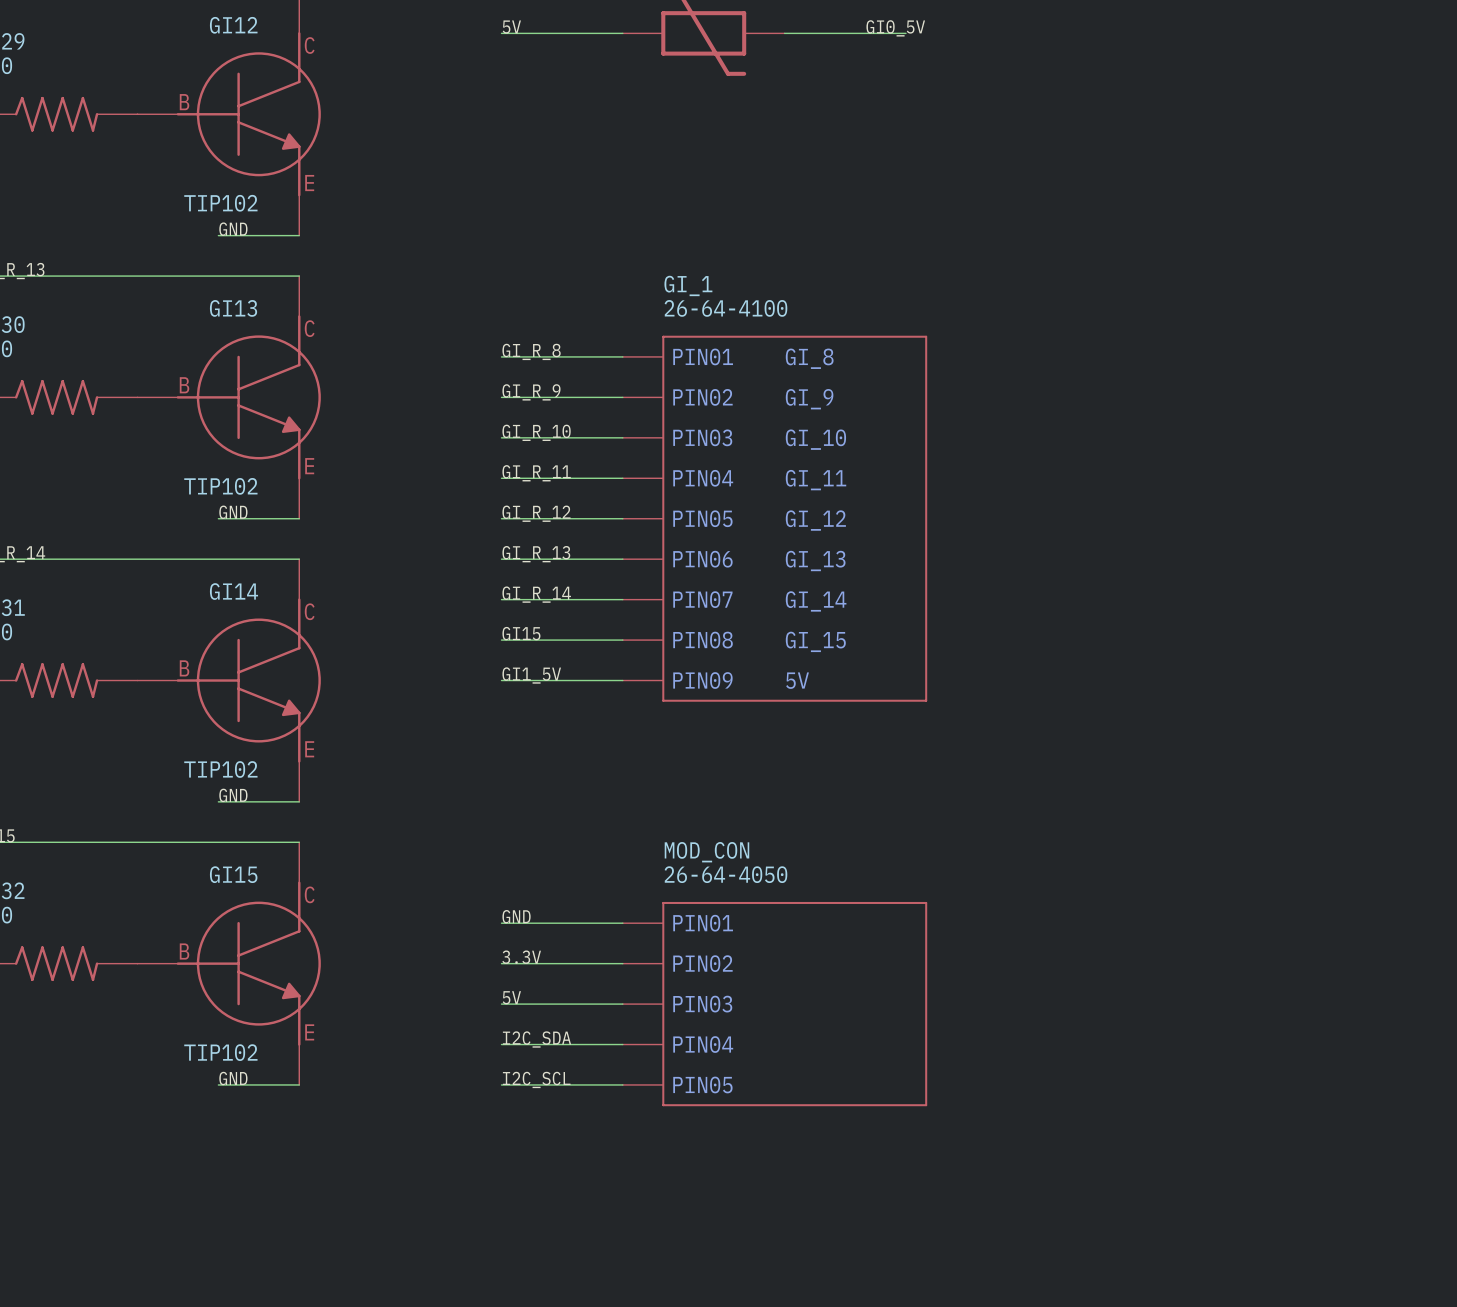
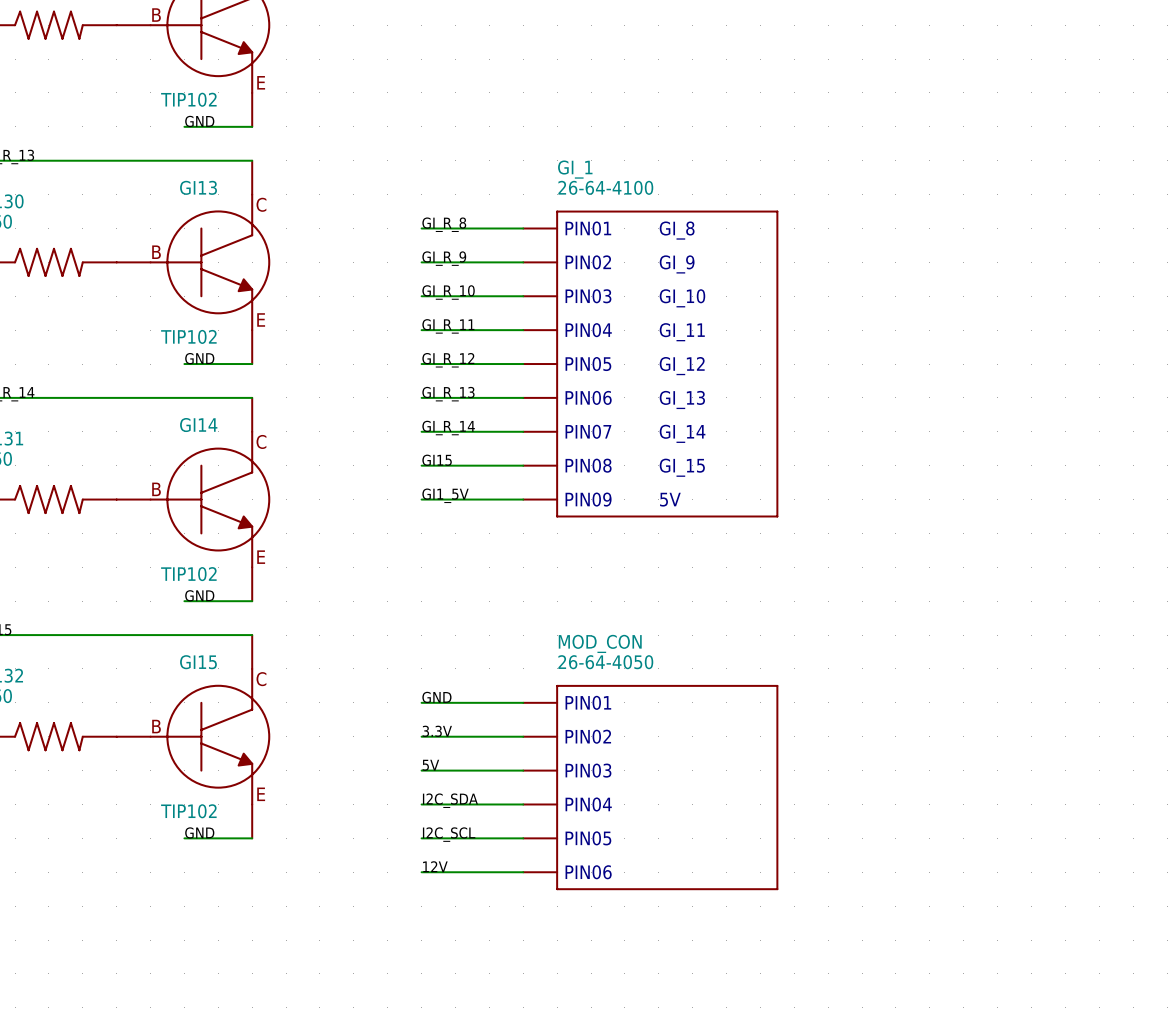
MOD_CON: 26-64-4050 (775, 1004) -> none
MOD_CON: none -> 26-64-4050 (650, 787)
label: none -> 12V (435, 866)
wire: none -> (421, 872) (523, 872)

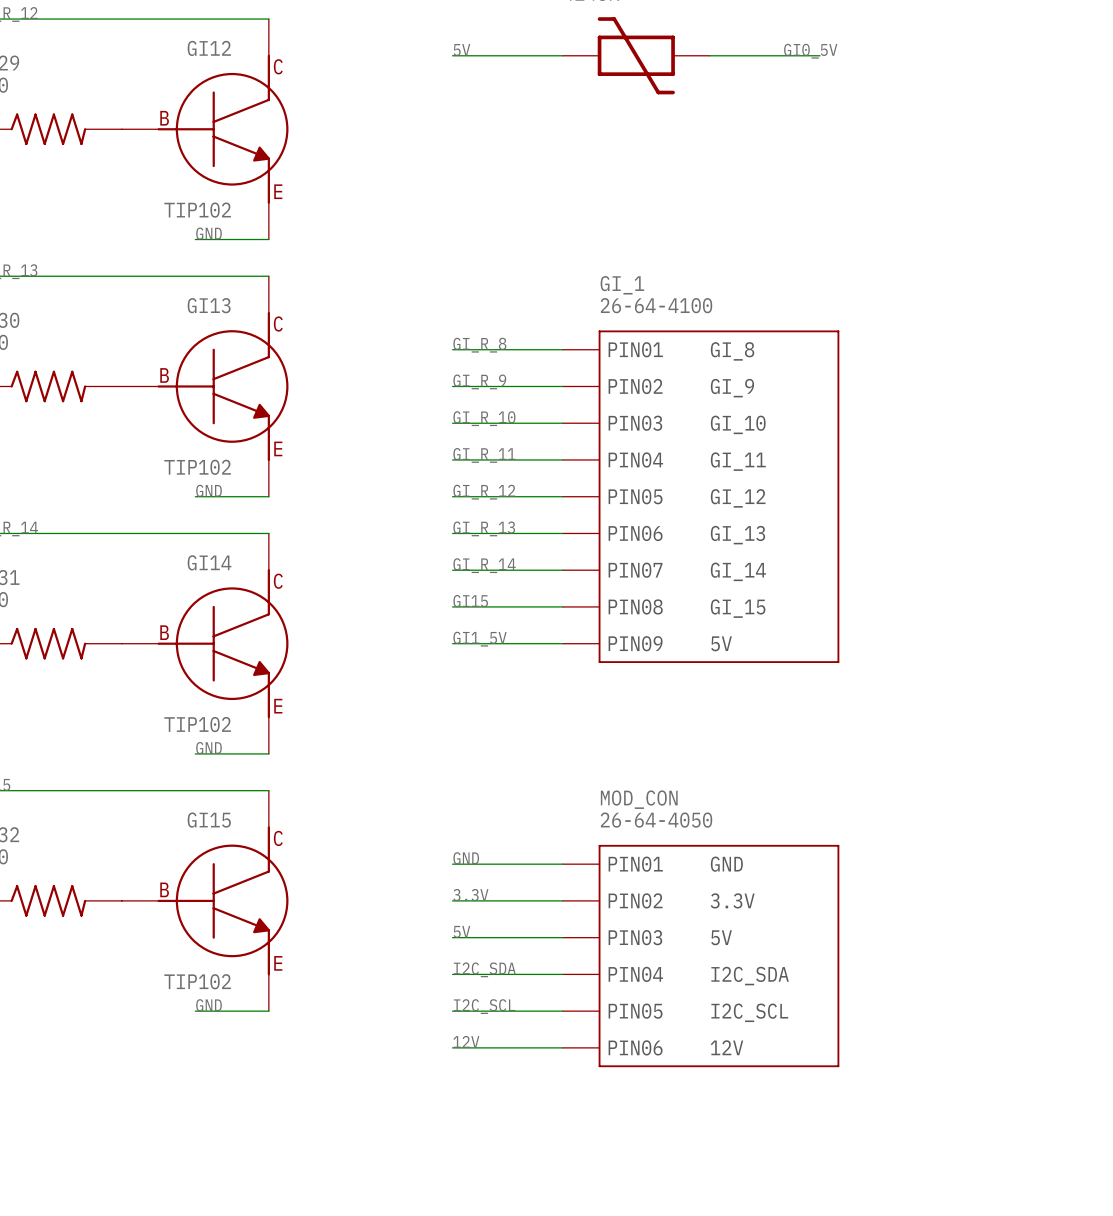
MOD_CON text: none -> GND (726, 864)
MOD_CON text: none -> 3.3V (732, 900)
MOD_CON text: none -> 5V (721, 937)
MOD_CON text: none -> I2C_SDA (750, 976)
MOD_CON text: none -> I2C_SCL (749, 1012)
MOD_CON text: none -> 12V (727, 1047)

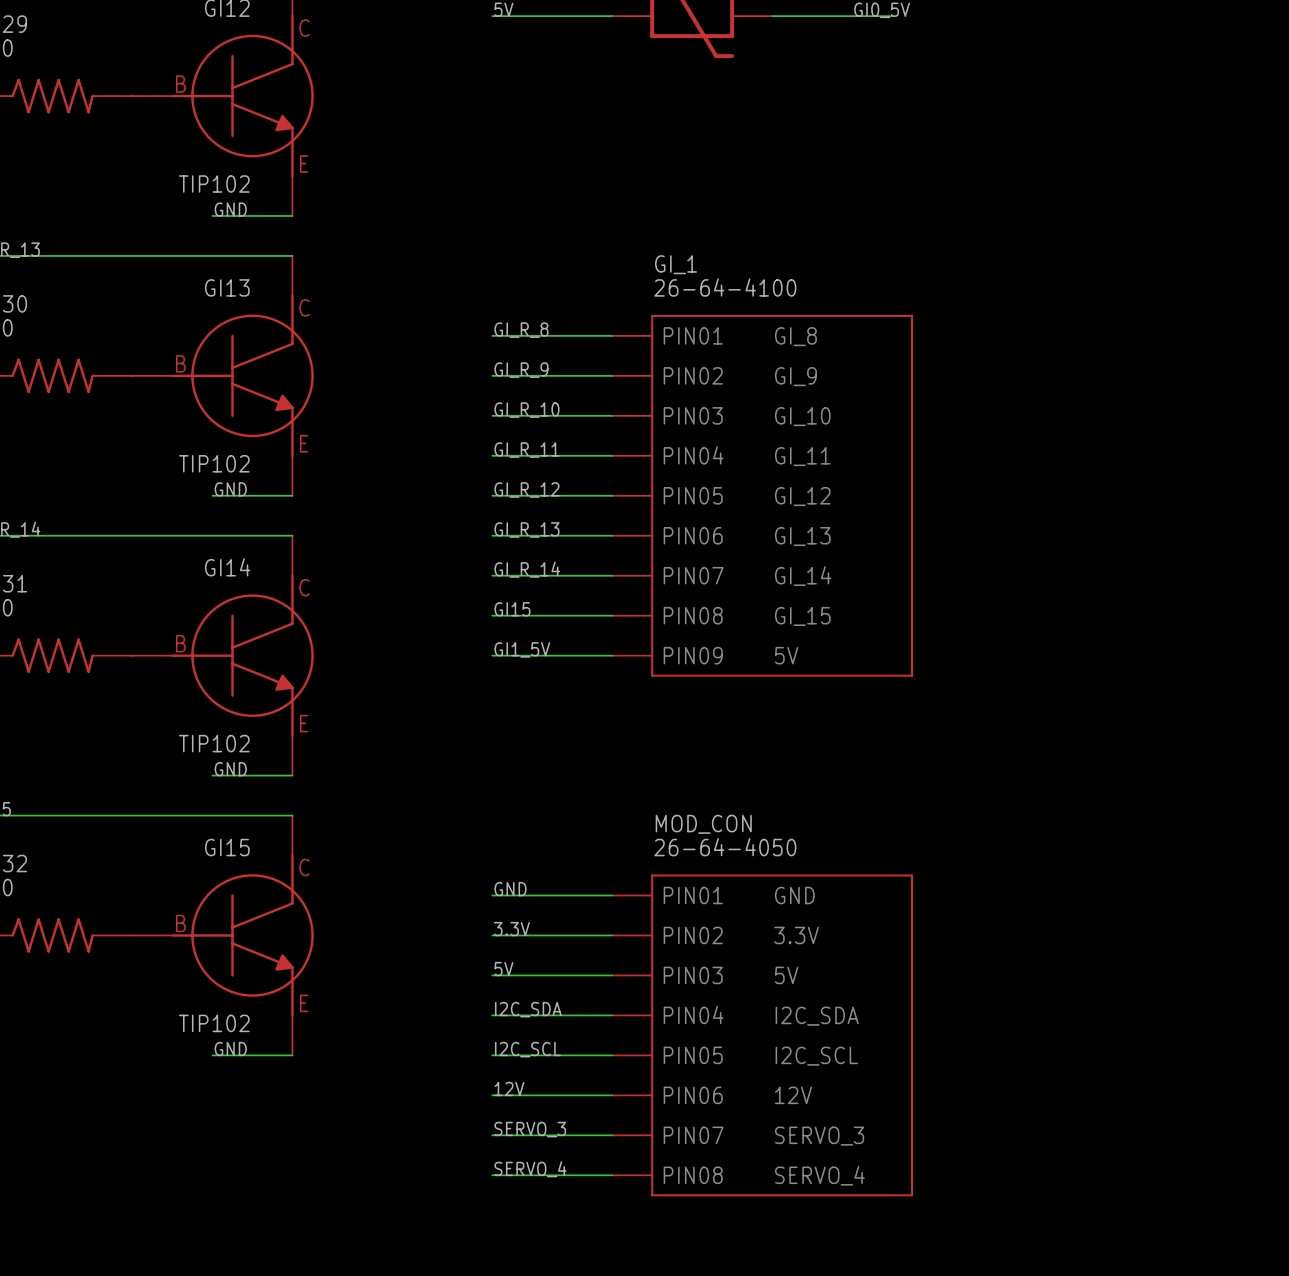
MOD_CON: 26-64-4050 (701, 956) -> none
MOD_CON: none -> 26-64-4050 (762, 1035)
label: none -> SERVO_3 (530, 1129)
wire: none -> (492, 1135) (612, 1135)
label: none -> SERVO_4 (530, 1169)
wire: none -> (492, 1175) (612, 1175)

